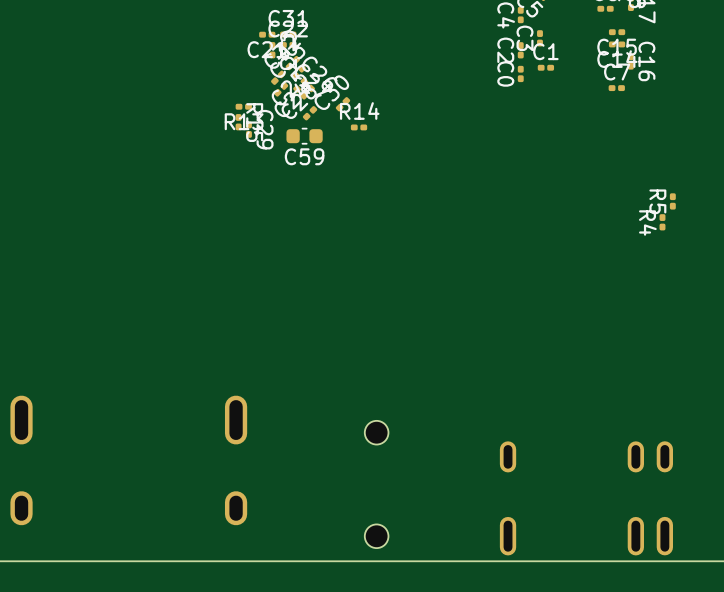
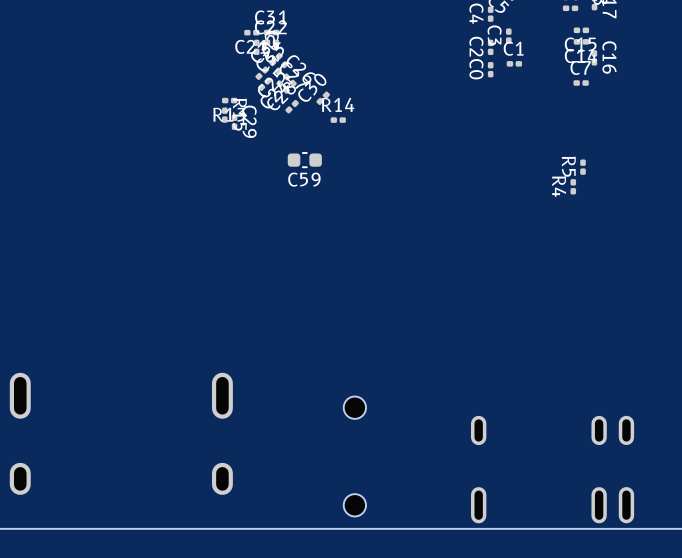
C59 position: (304, 136) -> (304, 160)
R5 position: (672, 201) -> (583, 167)
R4 position: (662, 222) -> (573, 186)

